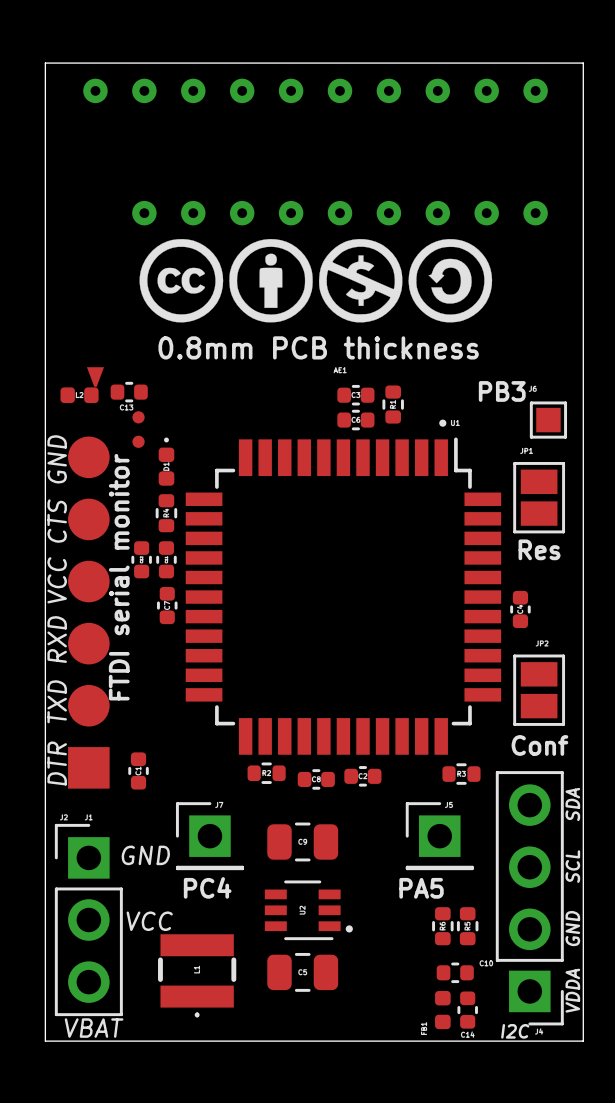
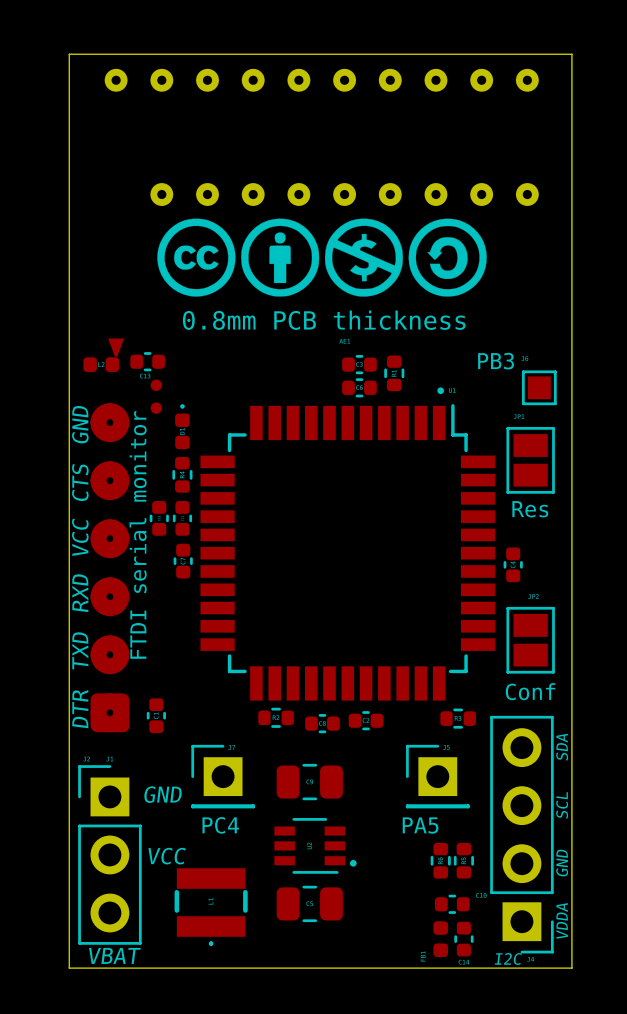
part footprint: [68, 436, 110, 789] -> [90, 403, 130, 733]

